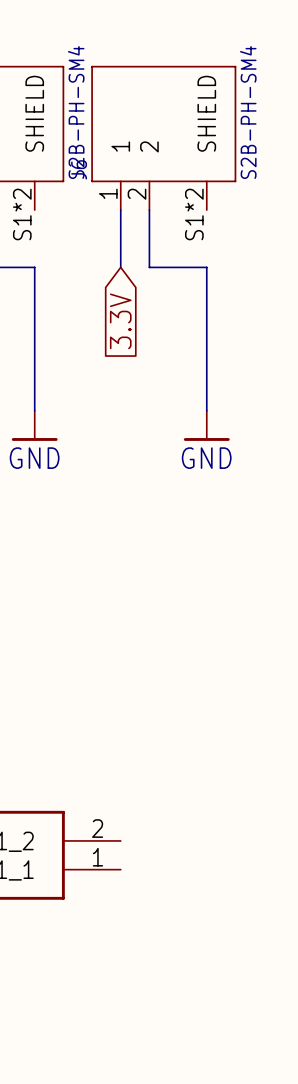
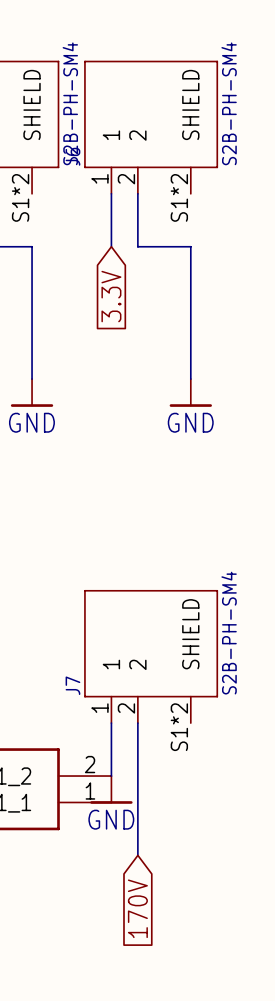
J7: none -> S2B-PH-SM4 (151, 656)
wire: none -> (111, 723) (111, 776)
wire: none -> (137, 723) (137, 855)
power symbol: none -> GND (111, 789)
global label: none -> 170V (137, 908)

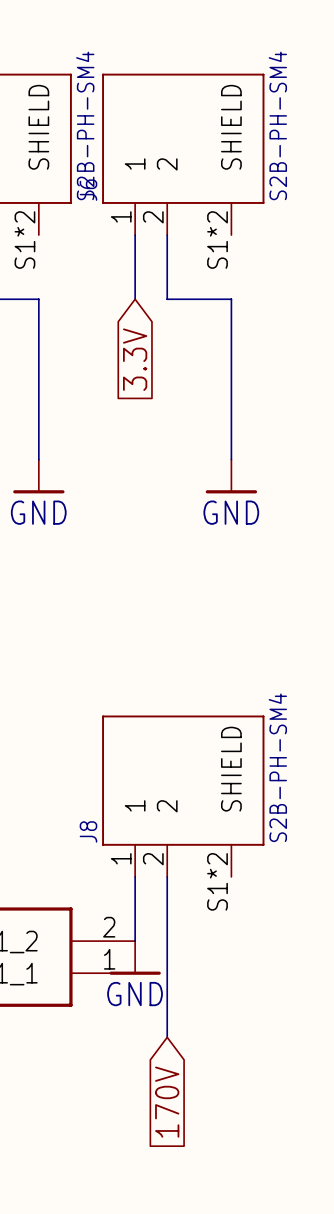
J7 name: J7 (72, 685) -> J8 (88, 831)

